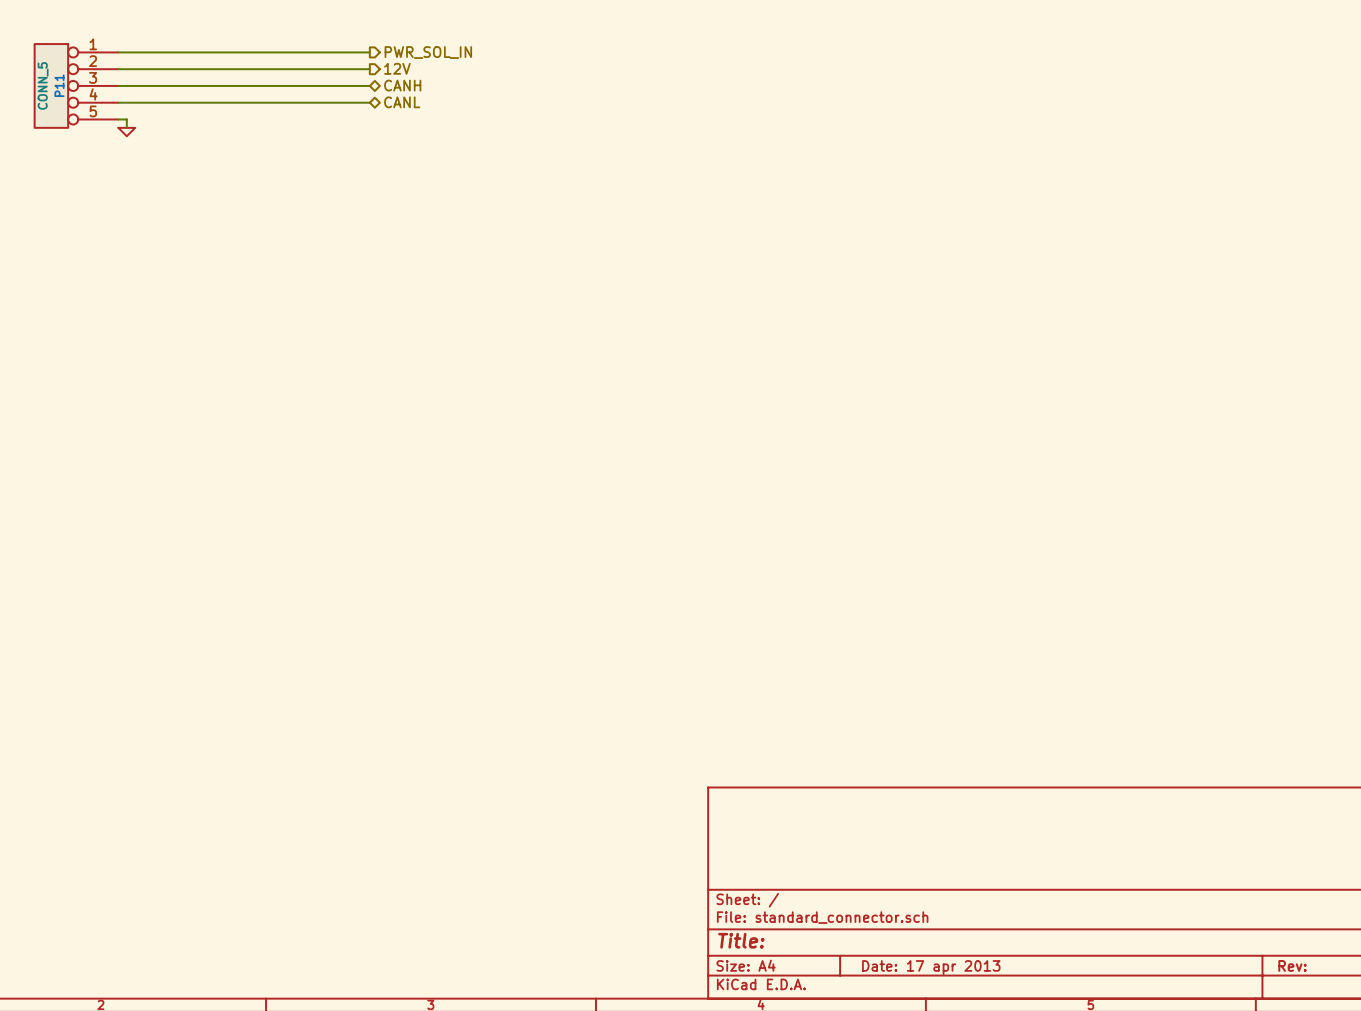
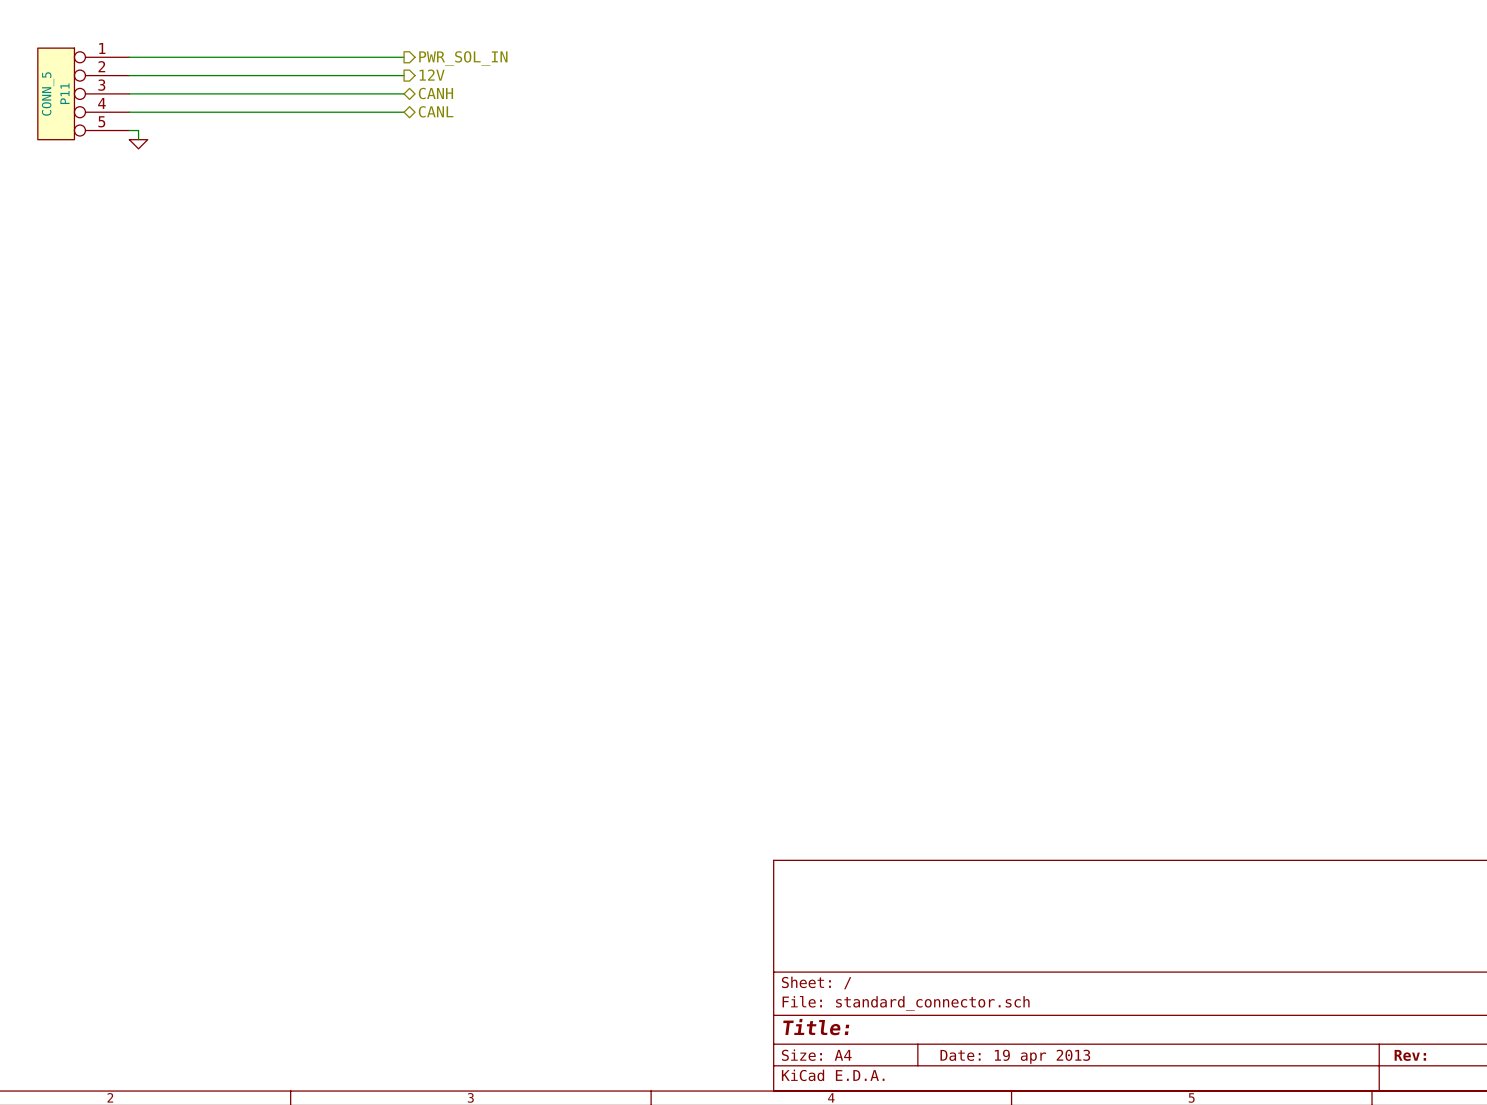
title block: Date: 17 apr 2013 (931, 967) -> Date: 19 apr 2013 (1015, 1056)

